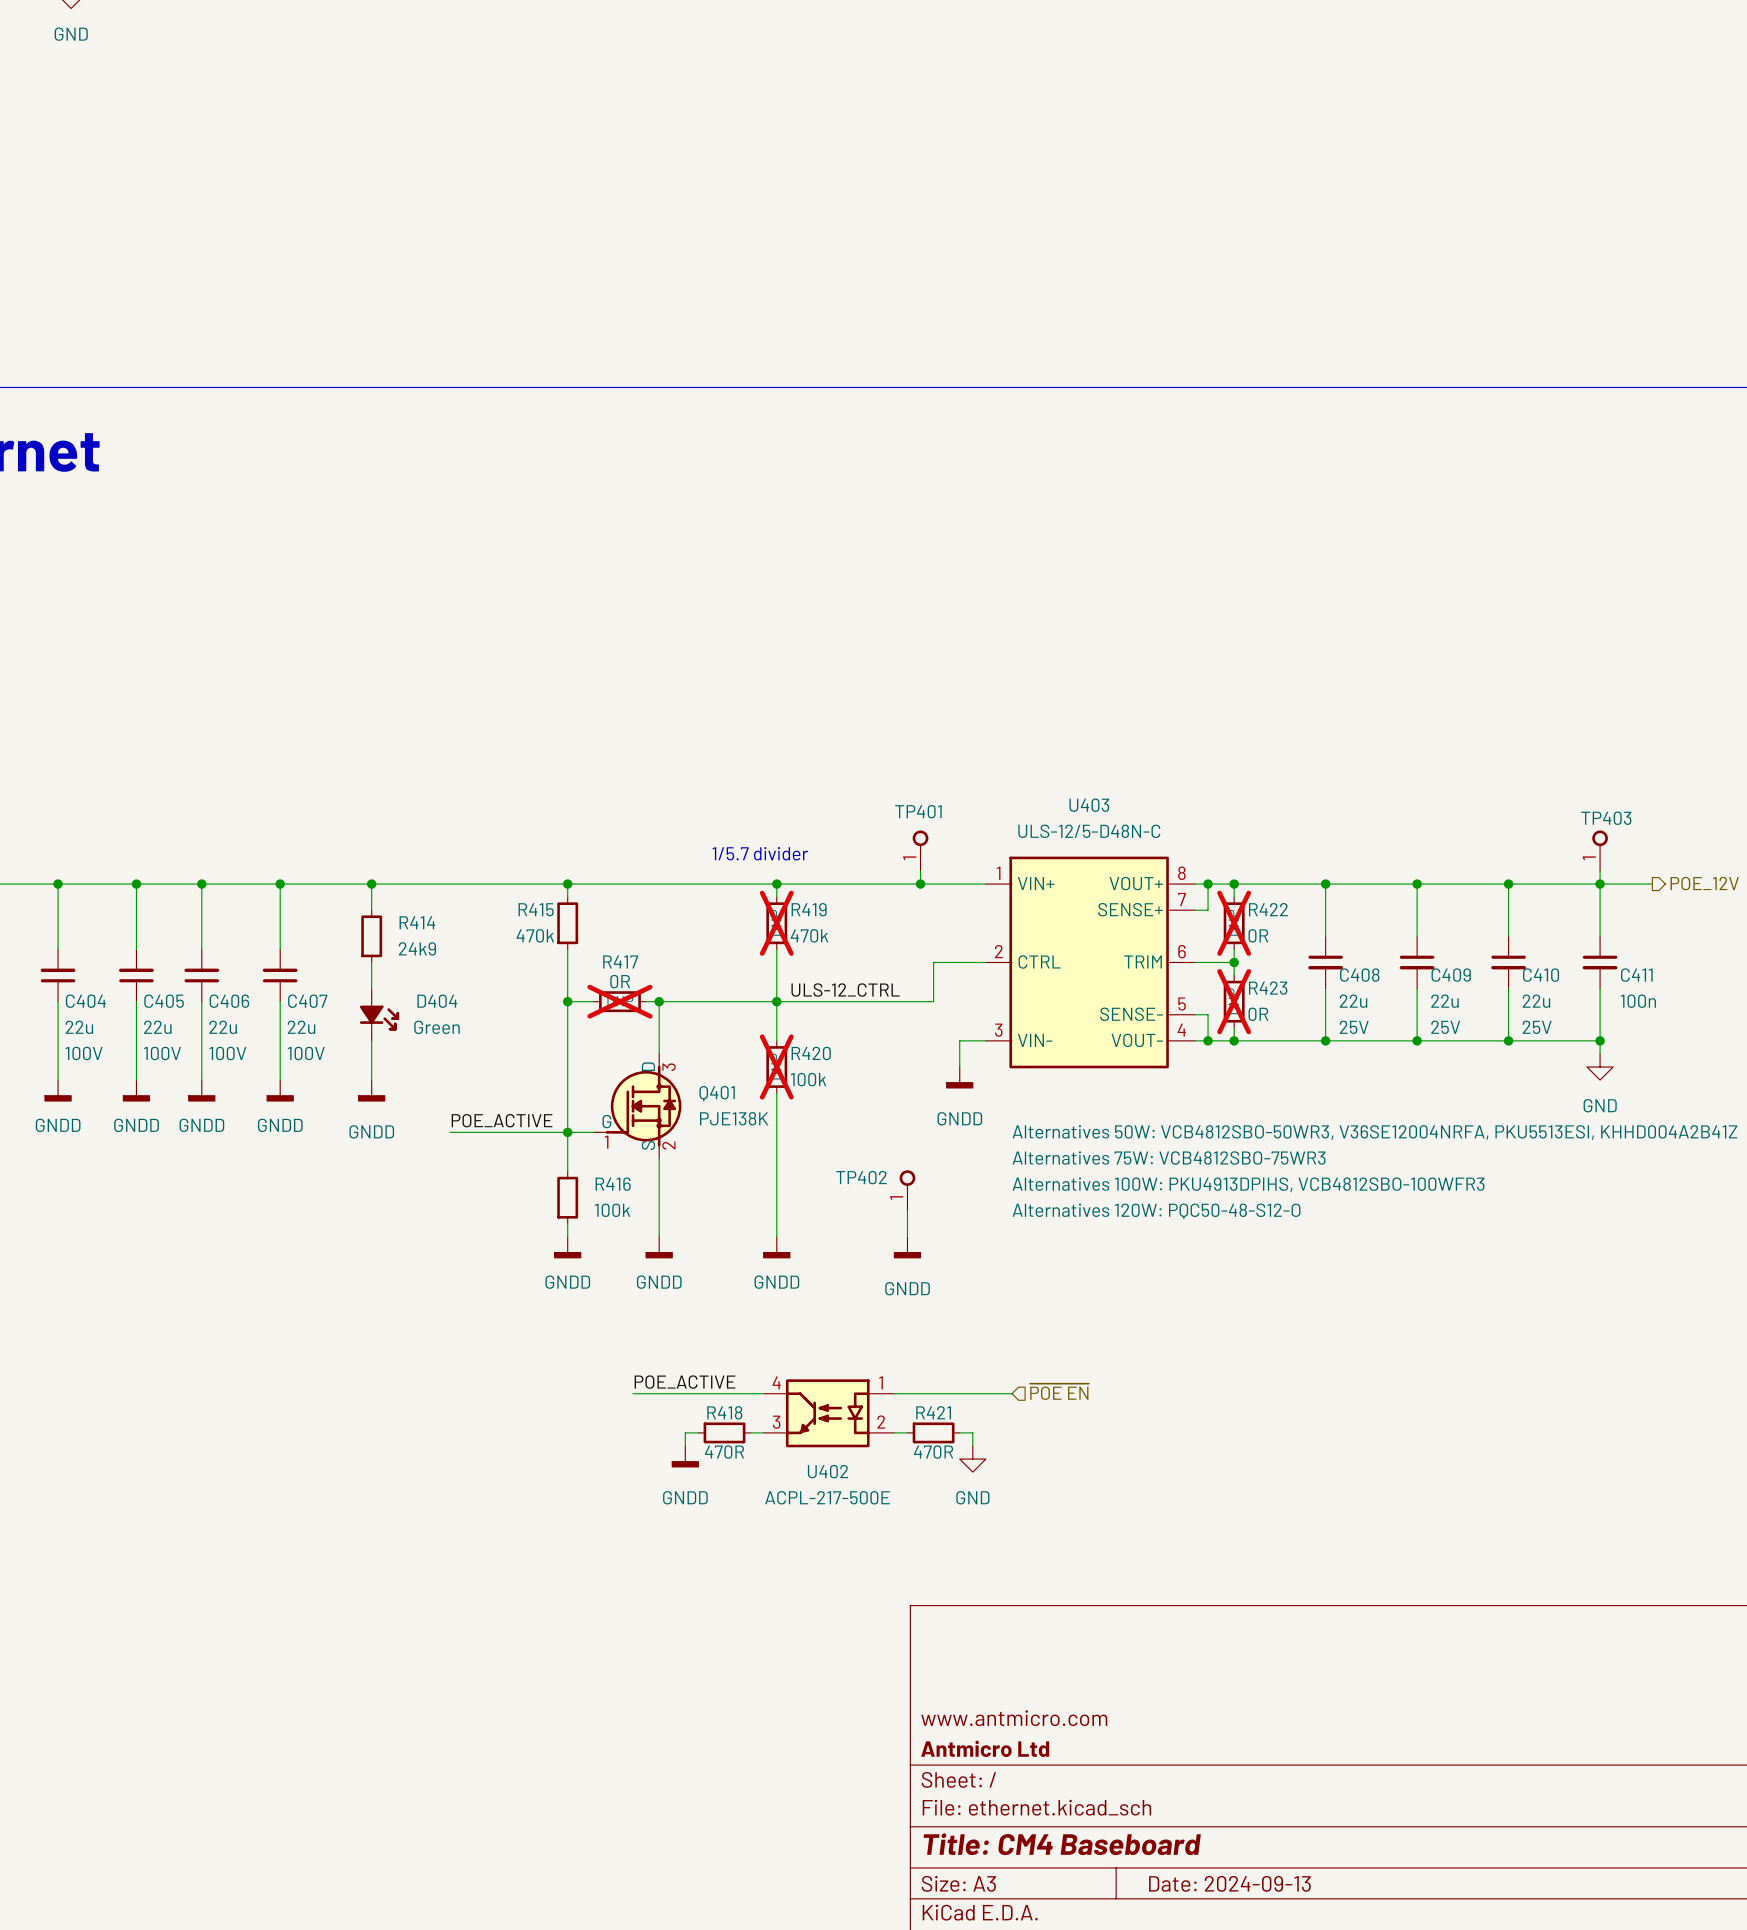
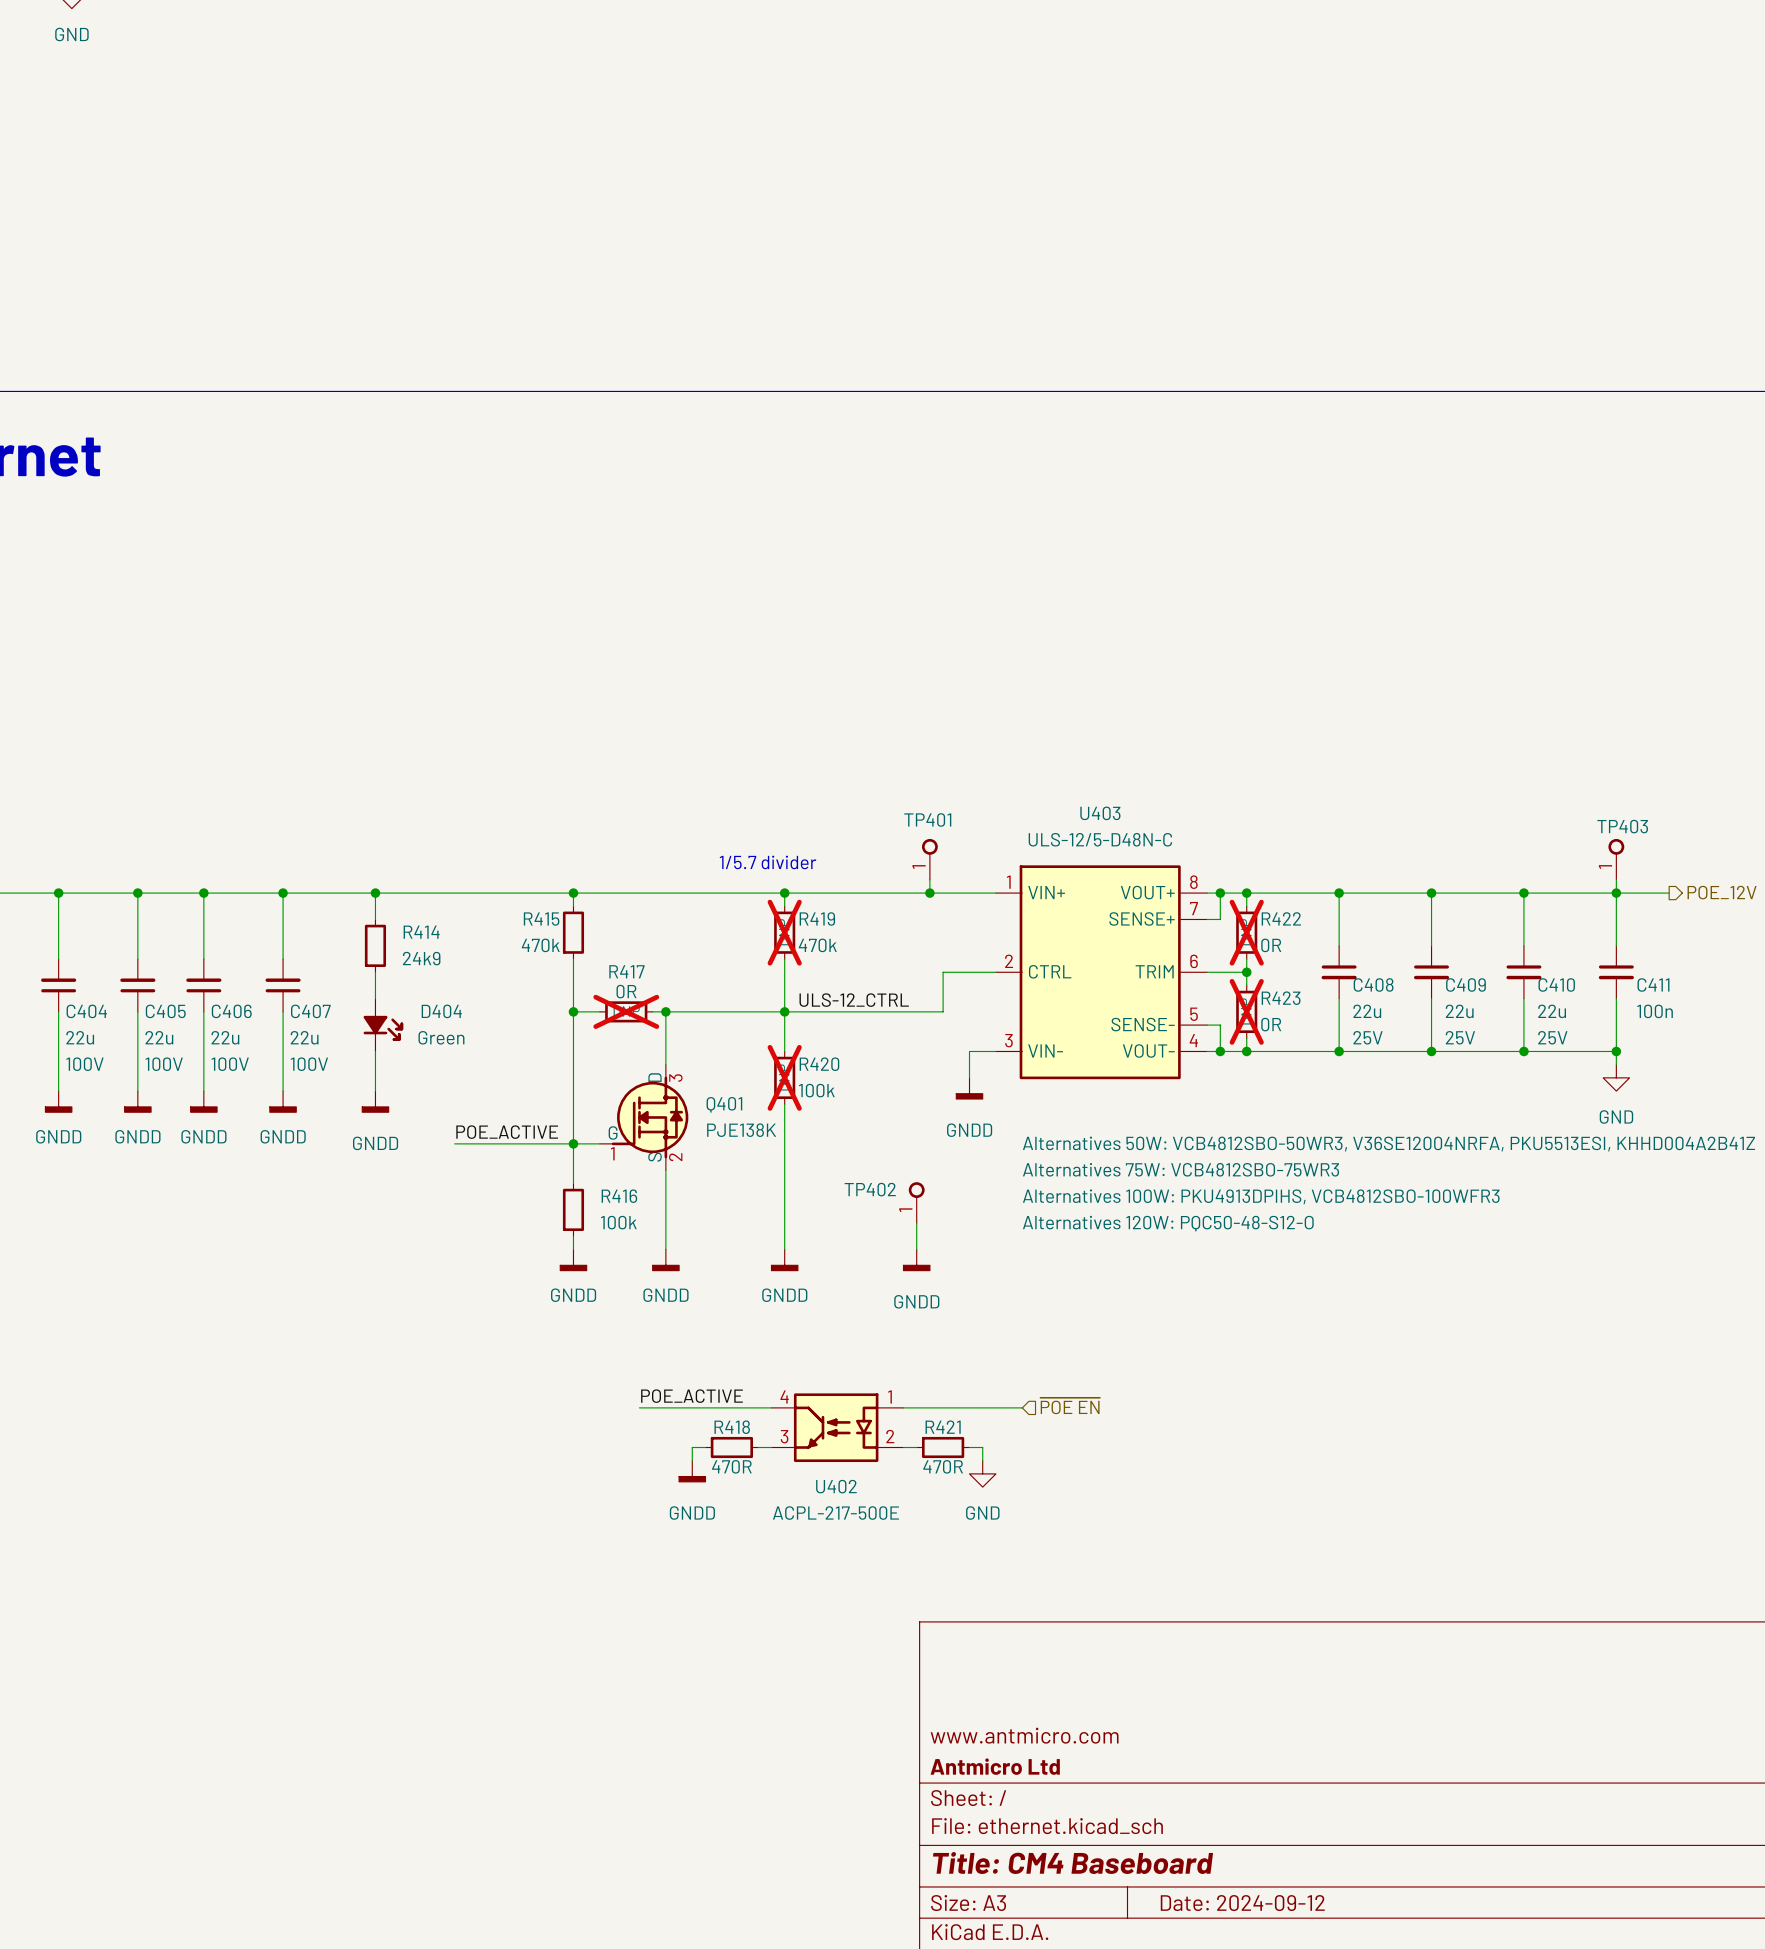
title block: Date: 2024-09-13 (1229, 1883) -> Date: 2024-09-12 (1242, 1903)

